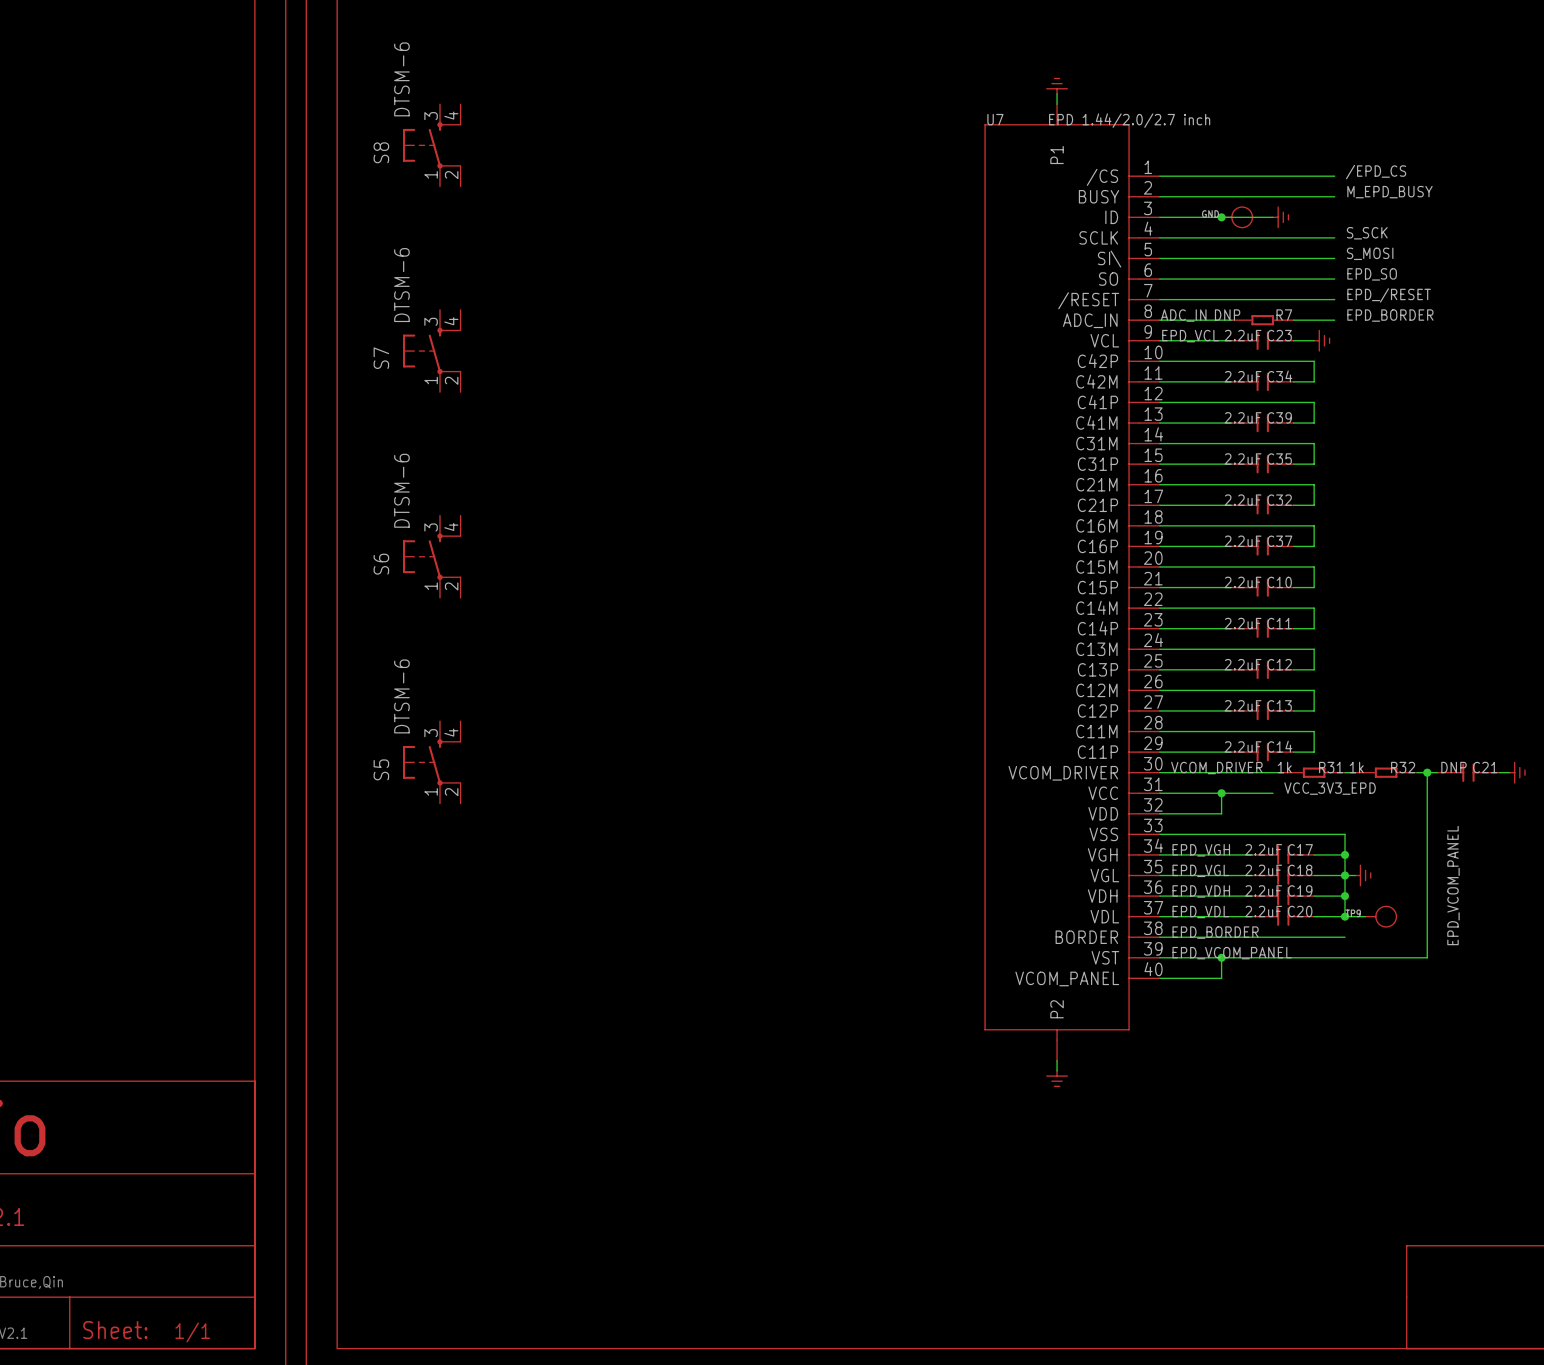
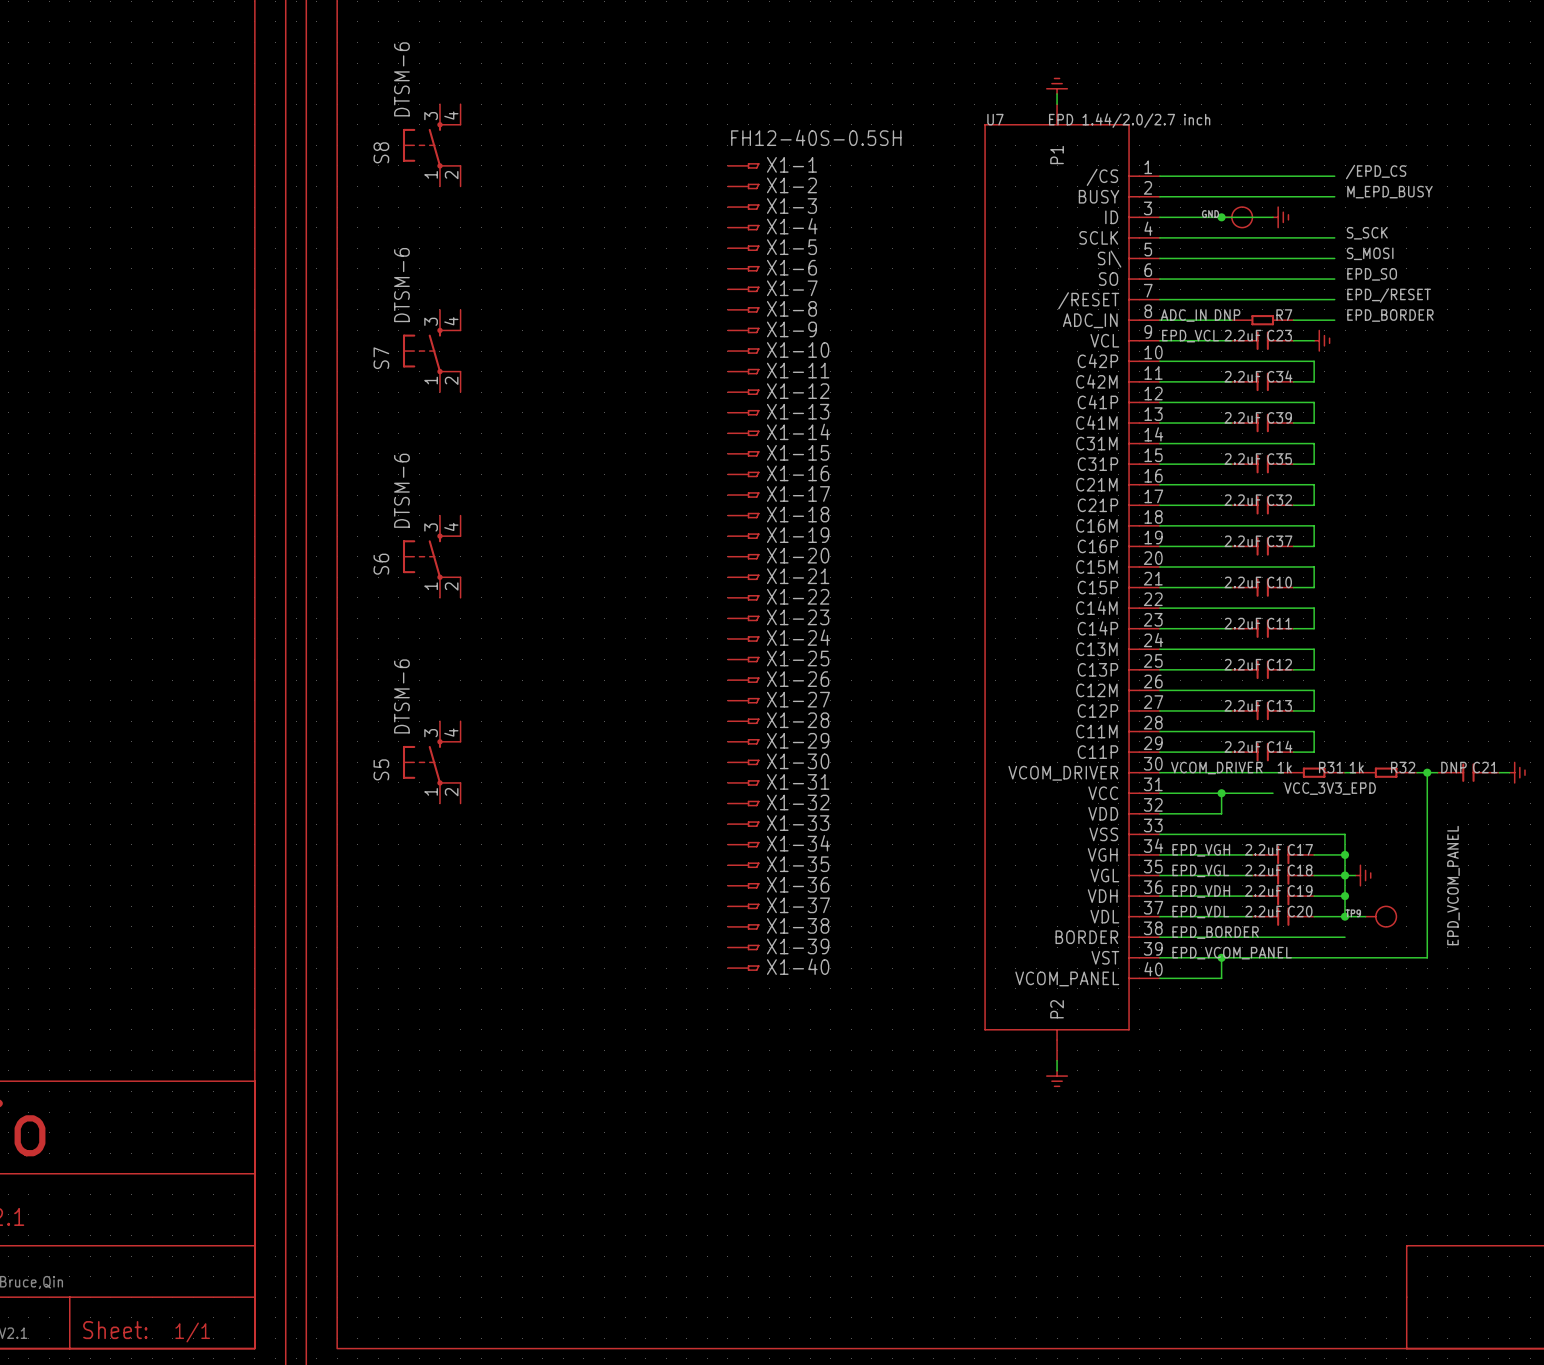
X1-1: none -> FH12-40S-0.5SH (743, 165)
X1-2: none -> (743, 186)
X1-3: none -> (743, 207)
X1-4: none -> (743, 227)
X1-5: none -> (743, 248)
X1-6: none -> (743, 268)
X1-7: none -> (743, 289)
X1-8: none -> (743, 309)
X1-9: none -> (743, 330)
X1-10: none -> (743, 351)
X1-11: none -> (743, 371)
X1-12: none -> (743, 392)
X1-13: none -> (743, 412)
X1-14: none -> (743, 433)
X1-15: none -> (743, 453)
X1-16: none -> (743, 474)
X1-17: none -> (743, 495)
X1-18: none -> (743, 515)
X1-19: none -> (743, 536)
X1-20: none -> (743, 556)
X1-21: none -> (743, 577)
X1-22: none -> (743, 597)
X1-23: none -> (743, 618)
X1-24: none -> (743, 638)
X1-25: none -> (743, 659)
X1-26: none -> (743, 680)
X1-27: none -> (743, 700)
X1-28: none -> (743, 721)
X1-29: none -> (743, 741)
X1-30: none -> (743, 762)
X1-31: none -> (743, 782)
X1-32: none -> (743, 803)
X1-33: none -> (743, 824)
X1-34: none -> (743, 844)
X1-35: none -> (743, 865)
X1-36: none -> (743, 885)
X1-37: none -> (743, 906)
X1-38: none -> (743, 926)
X1-39: none -> (743, 947)
X1-40: none -> (743, 968)

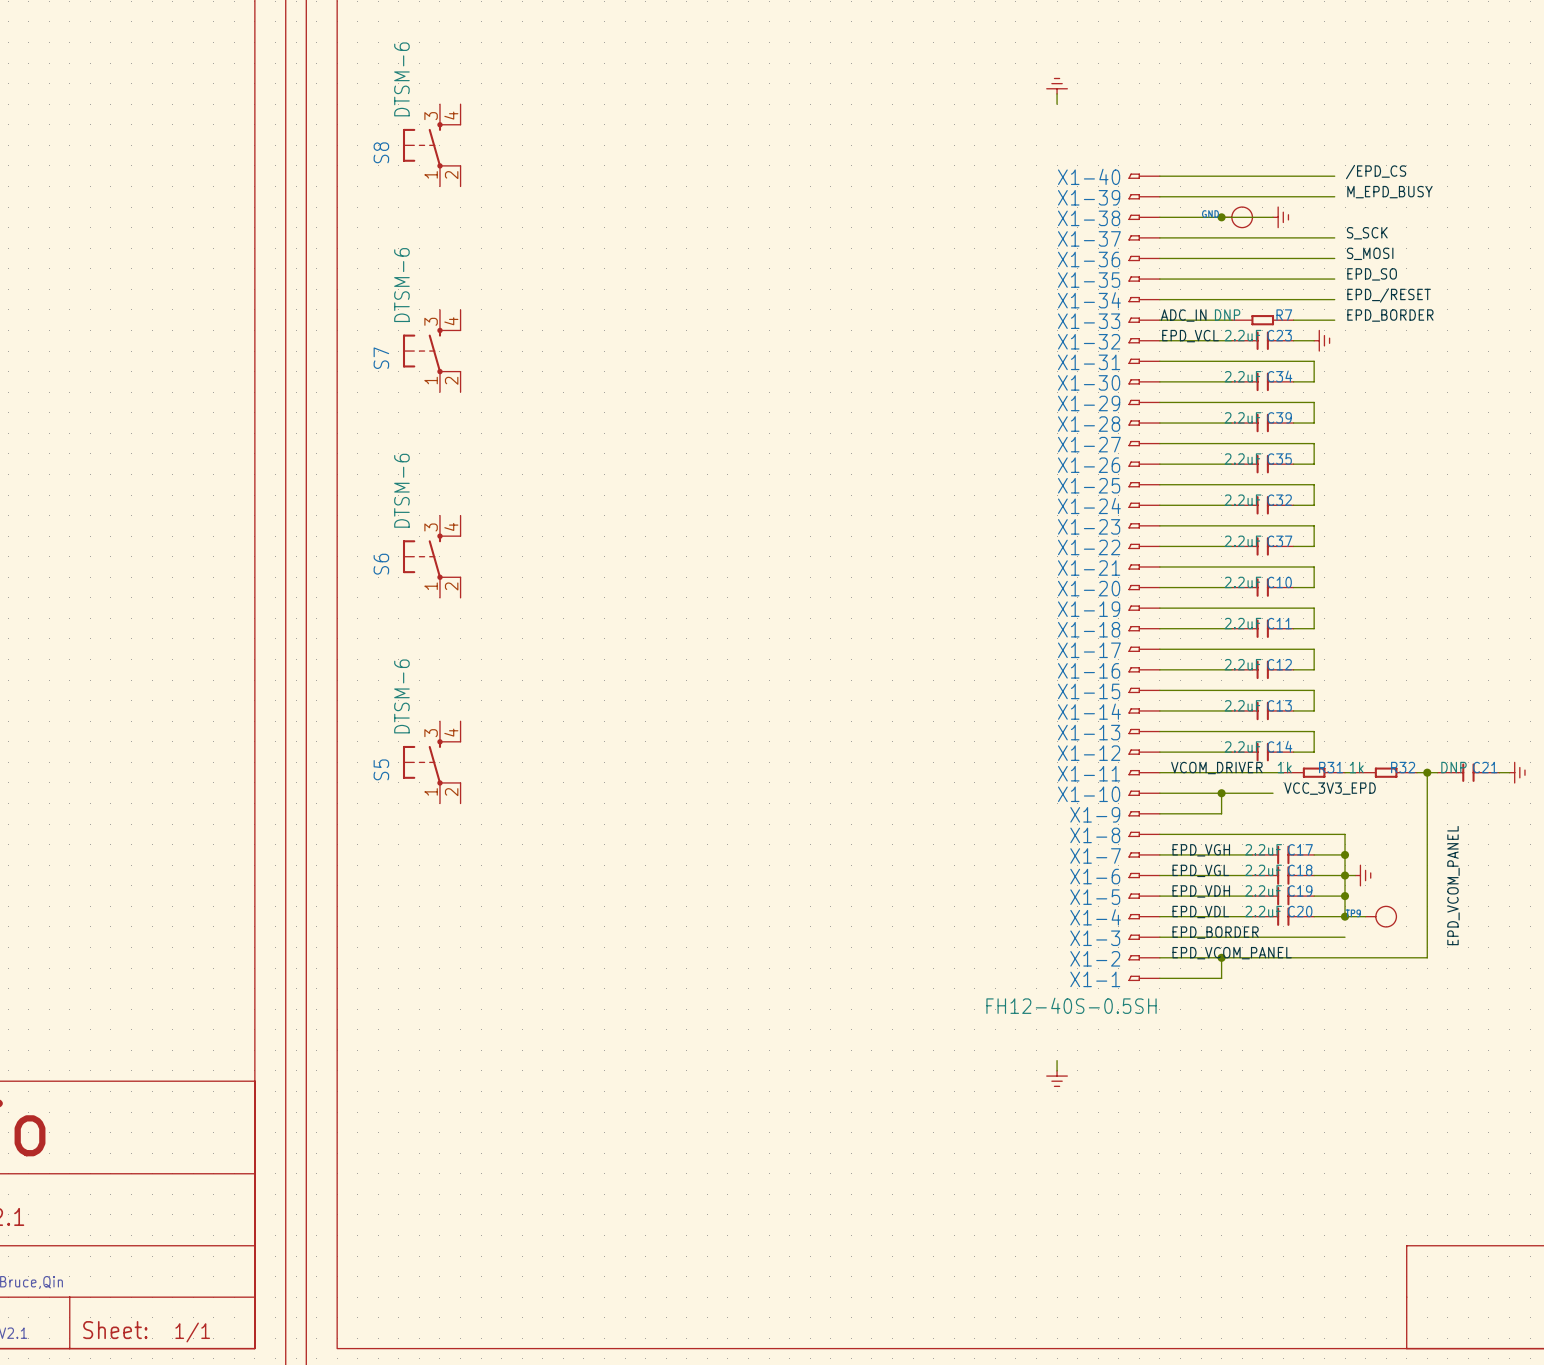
X1-1 position: (743, 165) -> (1144, 978)
X1-1 rotation: 0° (753, 165) -> 180° (1134, 978)
X1-2 position: (743, 186) -> (1144, 957)
X1-2 rotation: 0° (753, 186) -> 180° (1134, 957)
X1-3 position: (743, 207) -> (1144, 937)
X1-3 rotation: 0° (753, 207) -> 180° (1134, 937)
X1-4 position: (743, 227) -> (1144, 916)
X1-4 rotation: 0° (753, 227) -> 180° (1134, 916)
X1-5 position: (743, 248) -> (1144, 896)
X1-5 rotation: 0° (753, 248) -> 180° (1134, 896)
X1-6 position: (743, 268) -> (1144, 875)
X1-6 rotation: 0° (753, 268) -> 180° (1134, 875)
X1-7 position: (743, 289) -> (1144, 854)
X1-7 rotation: 0° (753, 289) -> 180° (1134, 854)
X1-8 position: (743, 309) -> (1144, 834)
X1-8 rotation: 0° (753, 309) -> 180° (1134, 834)
X1-9 position: (743, 330) -> (1144, 813)
X1-9 rotation: 0° (753, 330) -> 180° (1134, 813)
X1-10 position: (743, 351) -> (1144, 793)
X1-10 rotation: 0° (753, 351) -> 180° (1134, 793)
X1-11 position: (743, 371) -> (1144, 772)
X1-11 rotation: 0° (753, 371) -> 180° (1134, 772)
X1-12 position: (743, 392) -> (1144, 752)
X1-12 rotation: 0° (753, 392) -> 180° (1134, 752)
X1-13 position: (743, 412) -> (1144, 731)
X1-13 rotation: 0° (753, 412) -> 180° (1134, 731)
X1-14 position: (743, 433) -> (1144, 710)
X1-14 rotation: 0° (753, 433) -> 180° (1134, 710)
X1-15 position: (743, 453) -> (1144, 690)
X1-15 rotation: 0° (753, 453) -> 180° (1134, 690)
X1-16 position: (743, 474) -> (1144, 669)
X1-16 rotation: 0° (753, 474) -> 180° (1134, 669)
X1-17 position: (743, 495) -> (1144, 649)
X1-17 rotation: 0° (753, 495) -> 180° (1134, 649)
X1-18 position: (743, 515) -> (1144, 628)
X1-18 rotation: 0° (753, 515) -> 180° (1134, 628)
X1-19 position: (743, 536) -> (1144, 608)
X1-19 rotation: 0° (753, 536) -> 180° (1134, 608)
X1-20 position: (743, 556) -> (1144, 587)
X1-20 rotation: 0° (753, 556) -> 180° (1134, 587)
X1-21 position: (743, 577) -> (1144, 566)
X1-21 rotation: 0° (753, 577) -> 180° (1134, 566)
U7: EPD 1.44/2.0/2.7 inch (1072, 582) -> none
X1-22 position: (743, 597) -> (1144, 546)
X1-22 rotation: 0° (753, 597) -> 180° (1134, 546)
X1-23 position: (743, 618) -> (1144, 525)
X1-23 rotation: 0° (753, 618) -> 180° (1134, 525)
X1-24 position: (743, 638) -> (1144, 505)
X1-24 rotation: 0° (753, 638) -> 180° (1134, 505)
X1-25 position: (743, 659) -> (1144, 484)
X1-25 rotation: 0° (753, 659) -> 180° (1134, 484)
X1-26 position: (743, 680) -> (1144, 464)
X1-26 rotation: 0° (753, 680) -> 180° (1134, 464)
X1-27 position: (743, 700) -> (1144, 443)
X1-27 rotation: 0° (753, 700) -> 180° (1134, 443)
X1-28 position: (743, 721) -> (1144, 423)
X1-28 rotation: 0° (753, 721) -> 180° (1134, 423)
X1-29 position: (743, 741) -> (1144, 402)
X1-29 rotation: 0° (753, 741) -> 180° (1134, 402)
X1-30 position: (743, 762) -> (1144, 381)
X1-30 rotation: 0° (753, 762) -> 180° (1134, 381)
X1-31 position: (743, 782) -> (1144, 361)
X1-31 rotation: 0° (753, 782) -> 180° (1134, 361)
X1-32 position: (743, 803) -> (1144, 340)
X1-32 rotation: 0° (753, 803) -> 180° (1134, 340)
X1-33 position: (743, 824) -> (1144, 320)
X1-33 rotation: 0° (753, 824) -> 180° (1134, 320)
X1-34 position: (743, 844) -> (1144, 299)
X1-34 rotation: 0° (753, 844) -> 180° (1134, 299)
X1-35 position: (743, 865) -> (1144, 279)
X1-35 rotation: 0° (753, 865) -> 180° (1134, 279)
X1-36 position: (743, 885) -> (1144, 258)
X1-36 rotation: 0° (753, 885) -> 180° (1134, 258)
X1-37 position: (743, 906) -> (1144, 237)
X1-37 rotation: 0° (753, 906) -> 180° (1134, 237)
X1-38 position: (743, 926) -> (1144, 217)
X1-38 rotation: 0° (753, 926) -> 180° (1134, 217)
X1-39 position: (743, 947) -> (1144, 196)
X1-39 rotation: 0° (753, 947) -> 180° (1134, 196)
X1-40 position: (743, 968) -> (1144, 176)
X1-40 rotation: 0° (753, 968) -> 180° (1134, 176)

